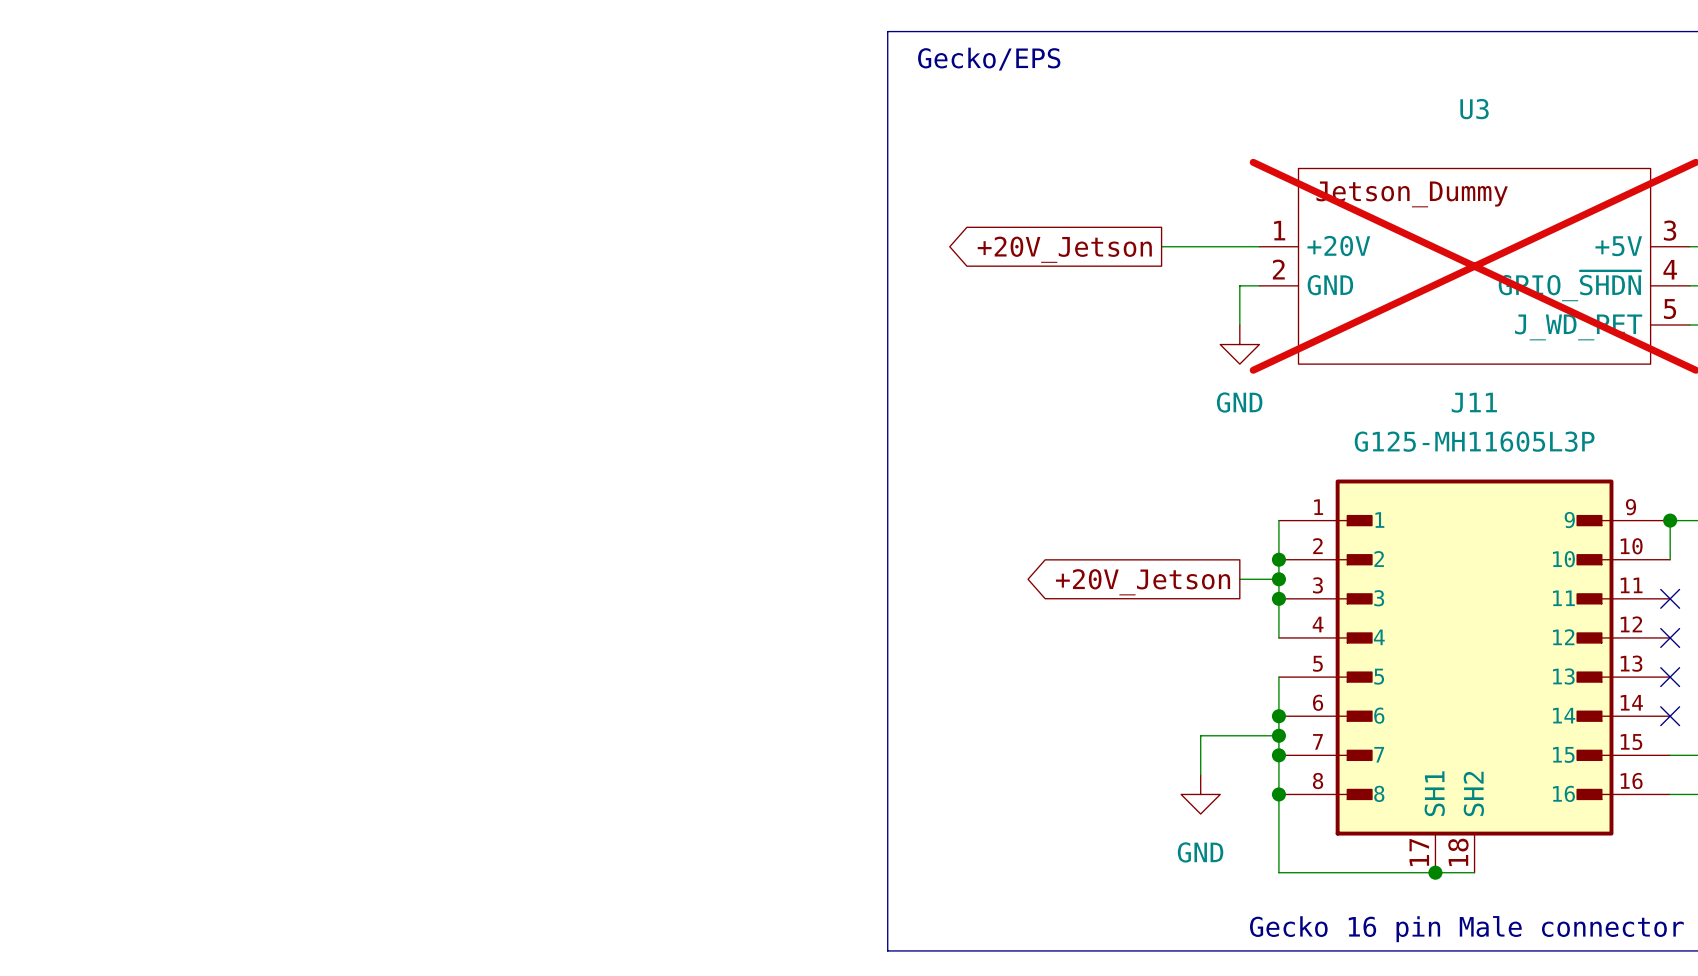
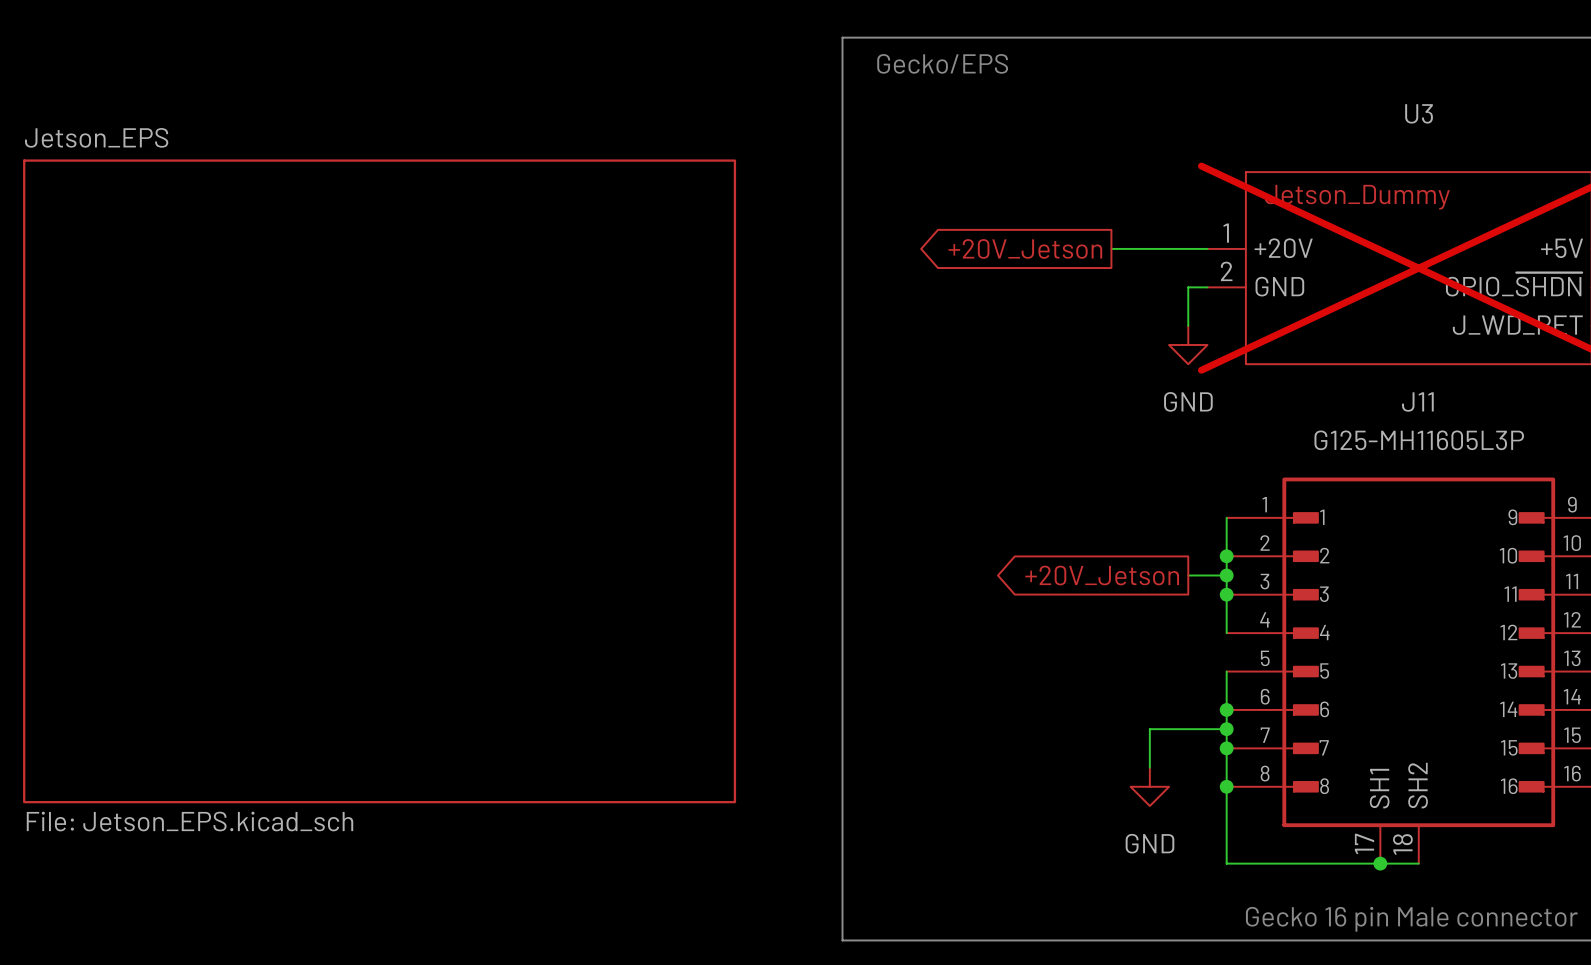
sheet Jetson_EPS: none -> File: Jetson_EPS.kicad_sch (379, 481)

